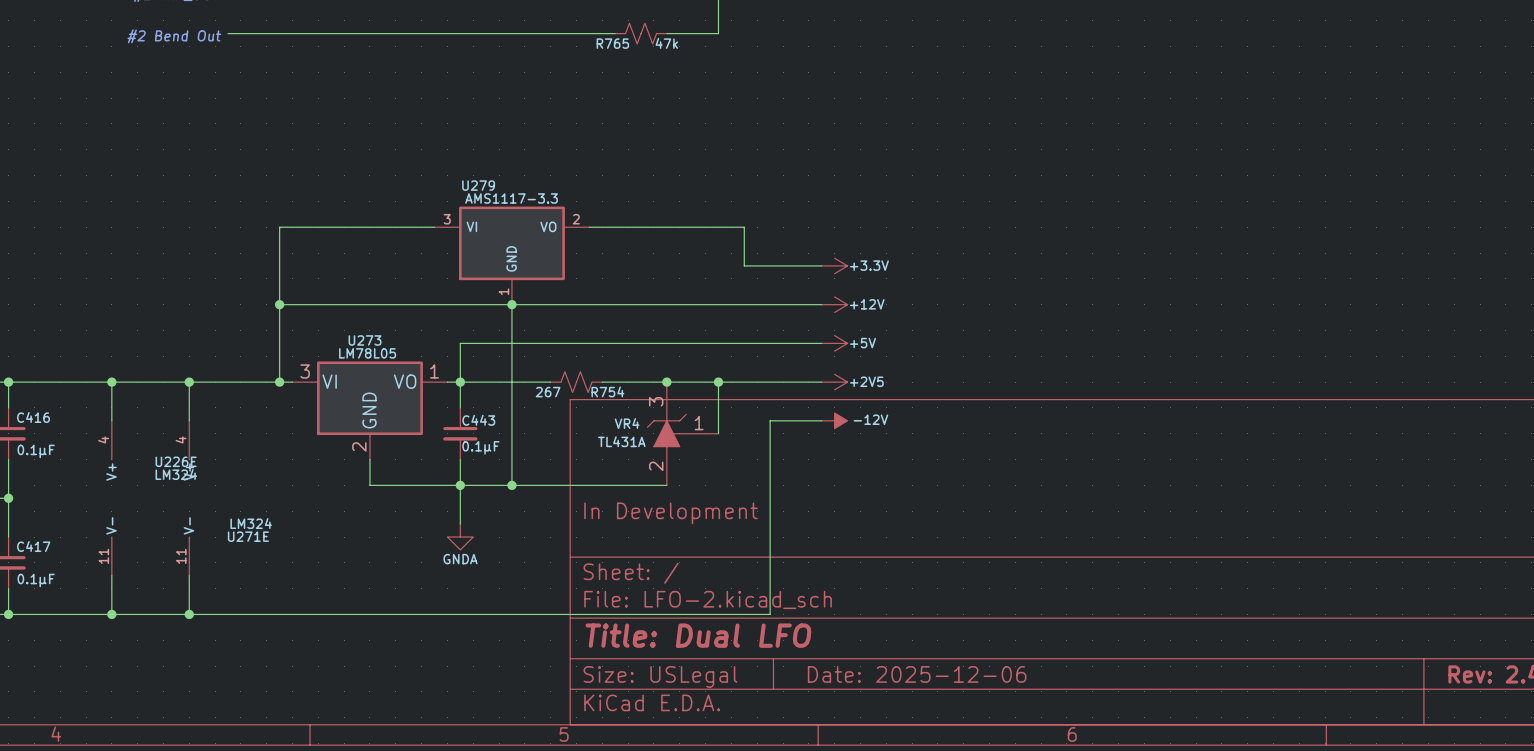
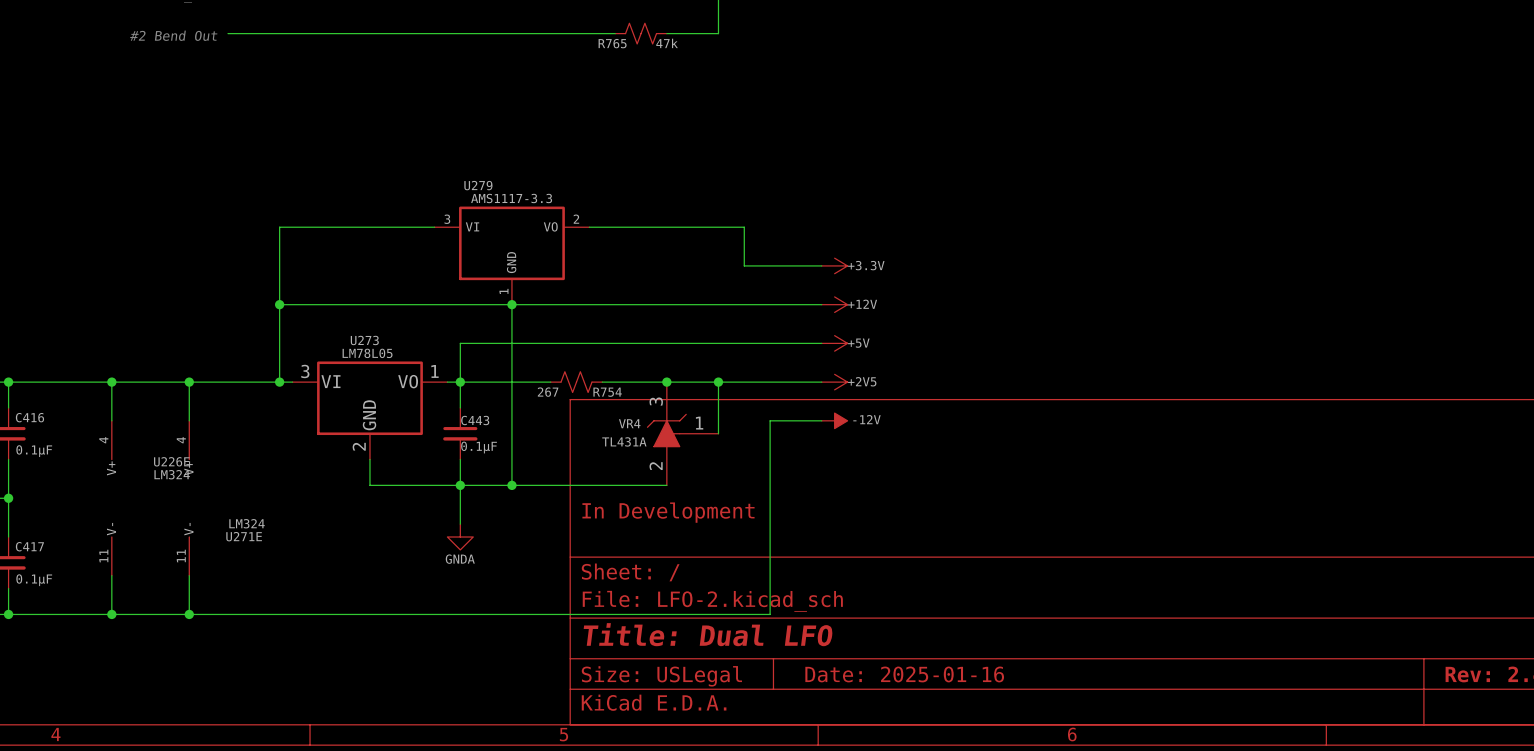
title block: Date: 2025-12-06 (917, 674) -> Date: 2025-01-16 (904, 674)

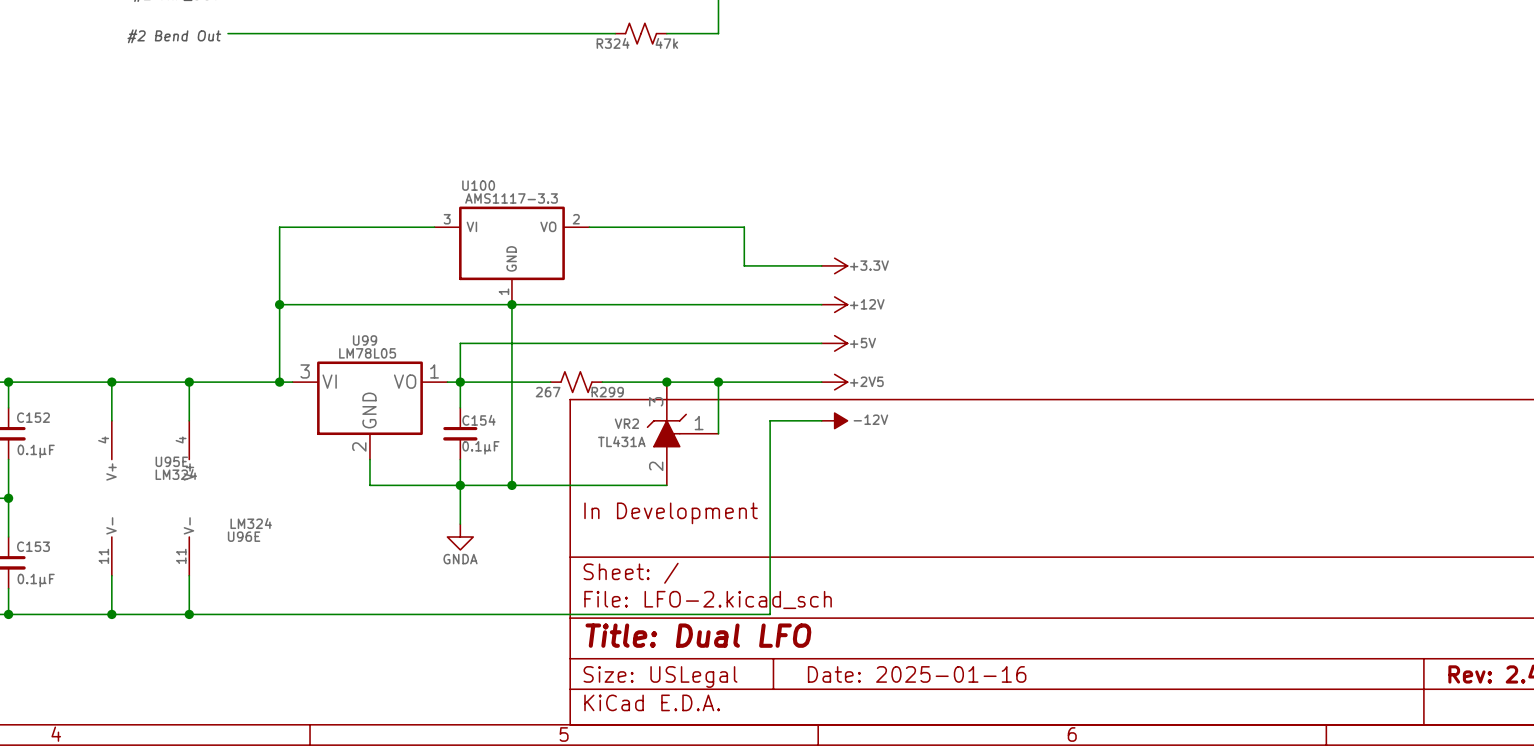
R765 name: R765 (612, 43) -> R324 (613, 43)
U279 name: U279 (478, 185) -> U100 (478, 185)
U273 name: U273 (364, 340) -> U99 (365, 340)
R754 name: R754 (607, 392) -> R299 (607, 392)
C416 name: C416 (29, 417) -> C152 (33, 417)
C443 name: C443 (475, 420) -> C154 (478, 420)
VR4 name: VR4 (629, 423) -> VR2 (626, 423)
U226E name: U226E (171, 461) -> U95E (171, 461)
U271E name: U271E (244, 536) -> U96E (244, 536)
C417 name: C417 (29, 546) -> C153 (33, 546)

